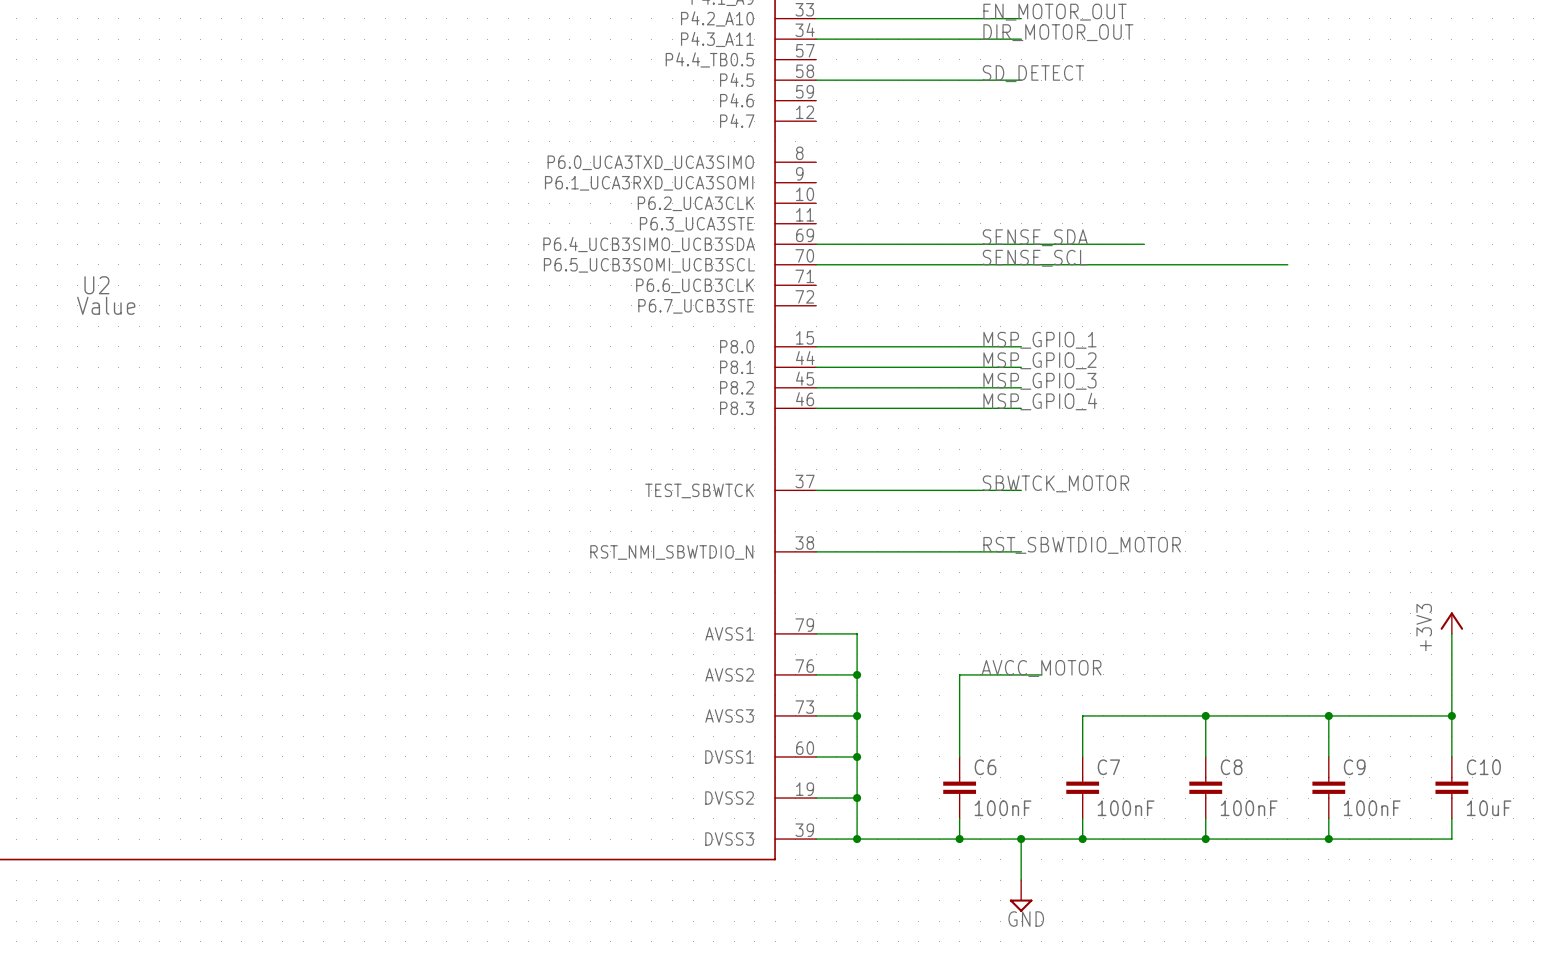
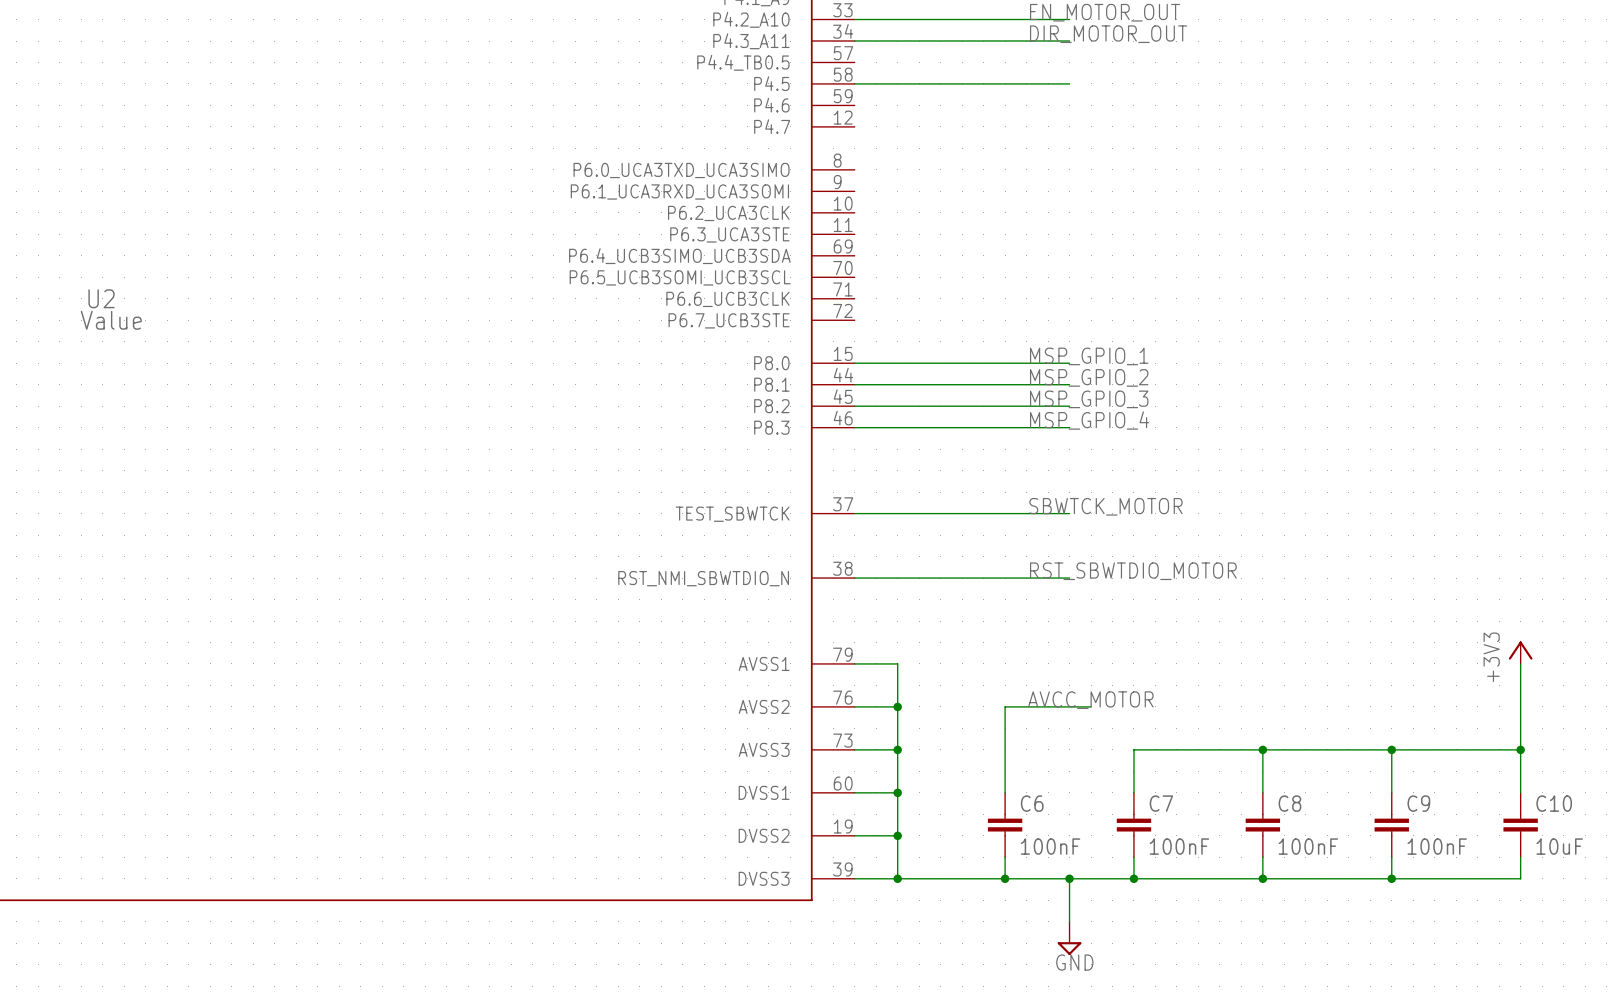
label: SD_DETECT (1033, 73) -> none
label: SENSE_SDA (1035, 237) -> none
wire: (816, 244) (1144, 244) -> none
label: SENSE_SCL (1035, 258) -> none
wire: (816, 264) (1287, 264) -> none

